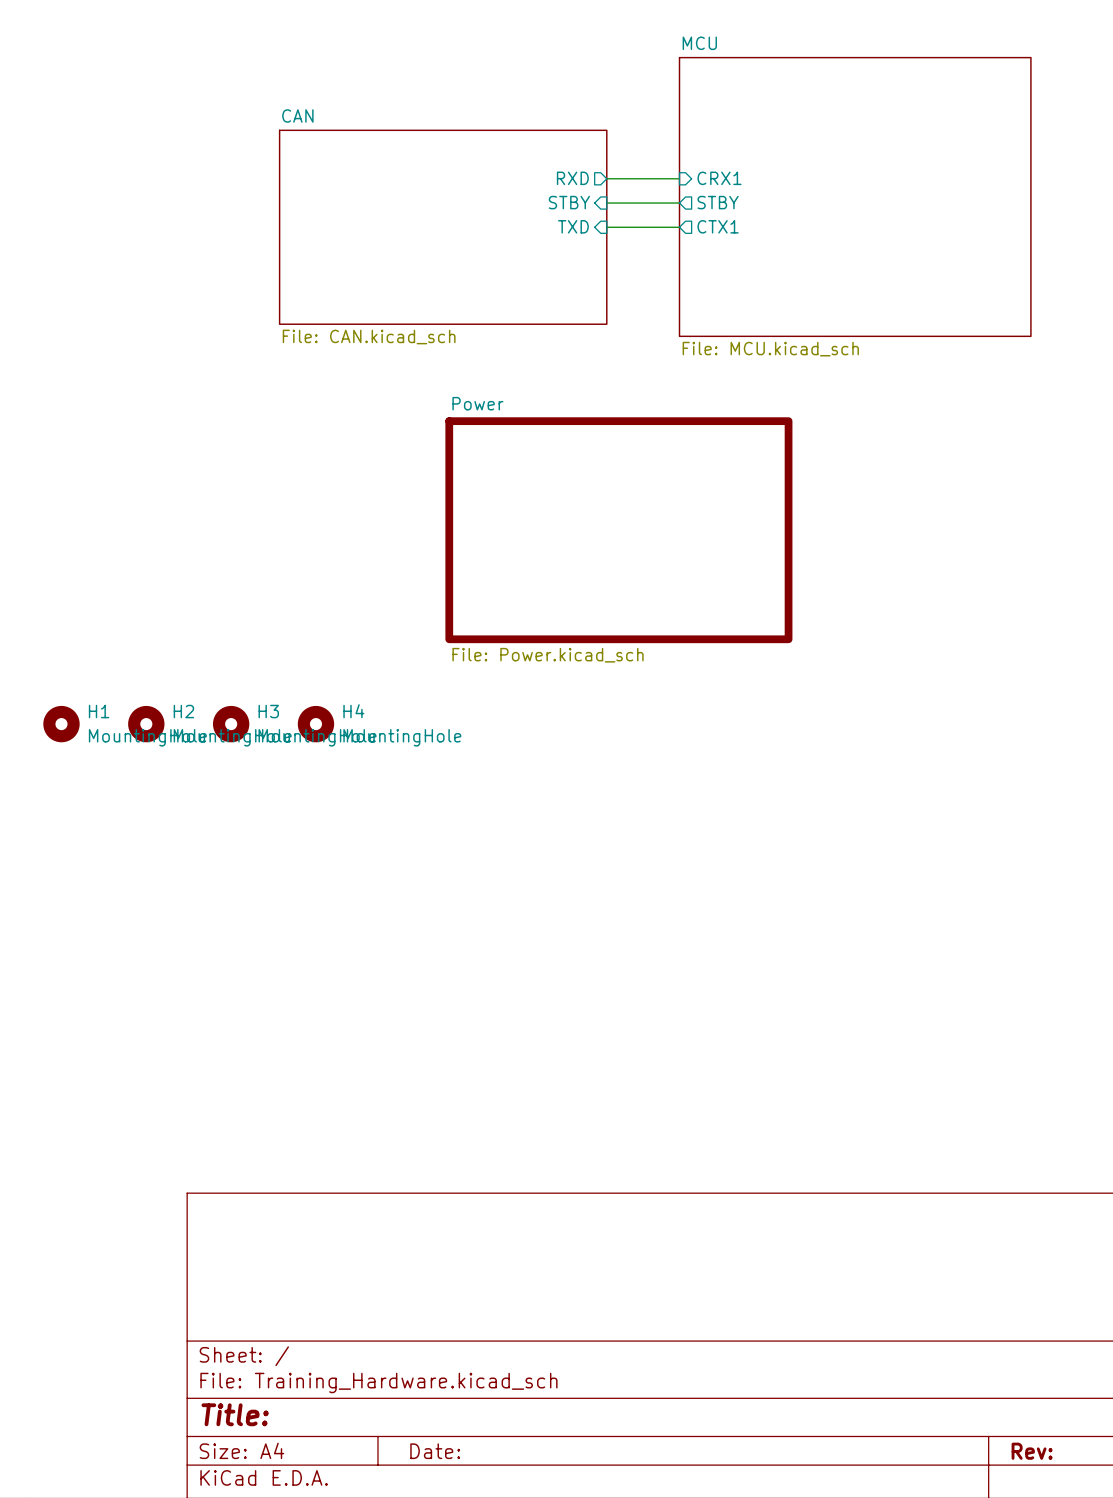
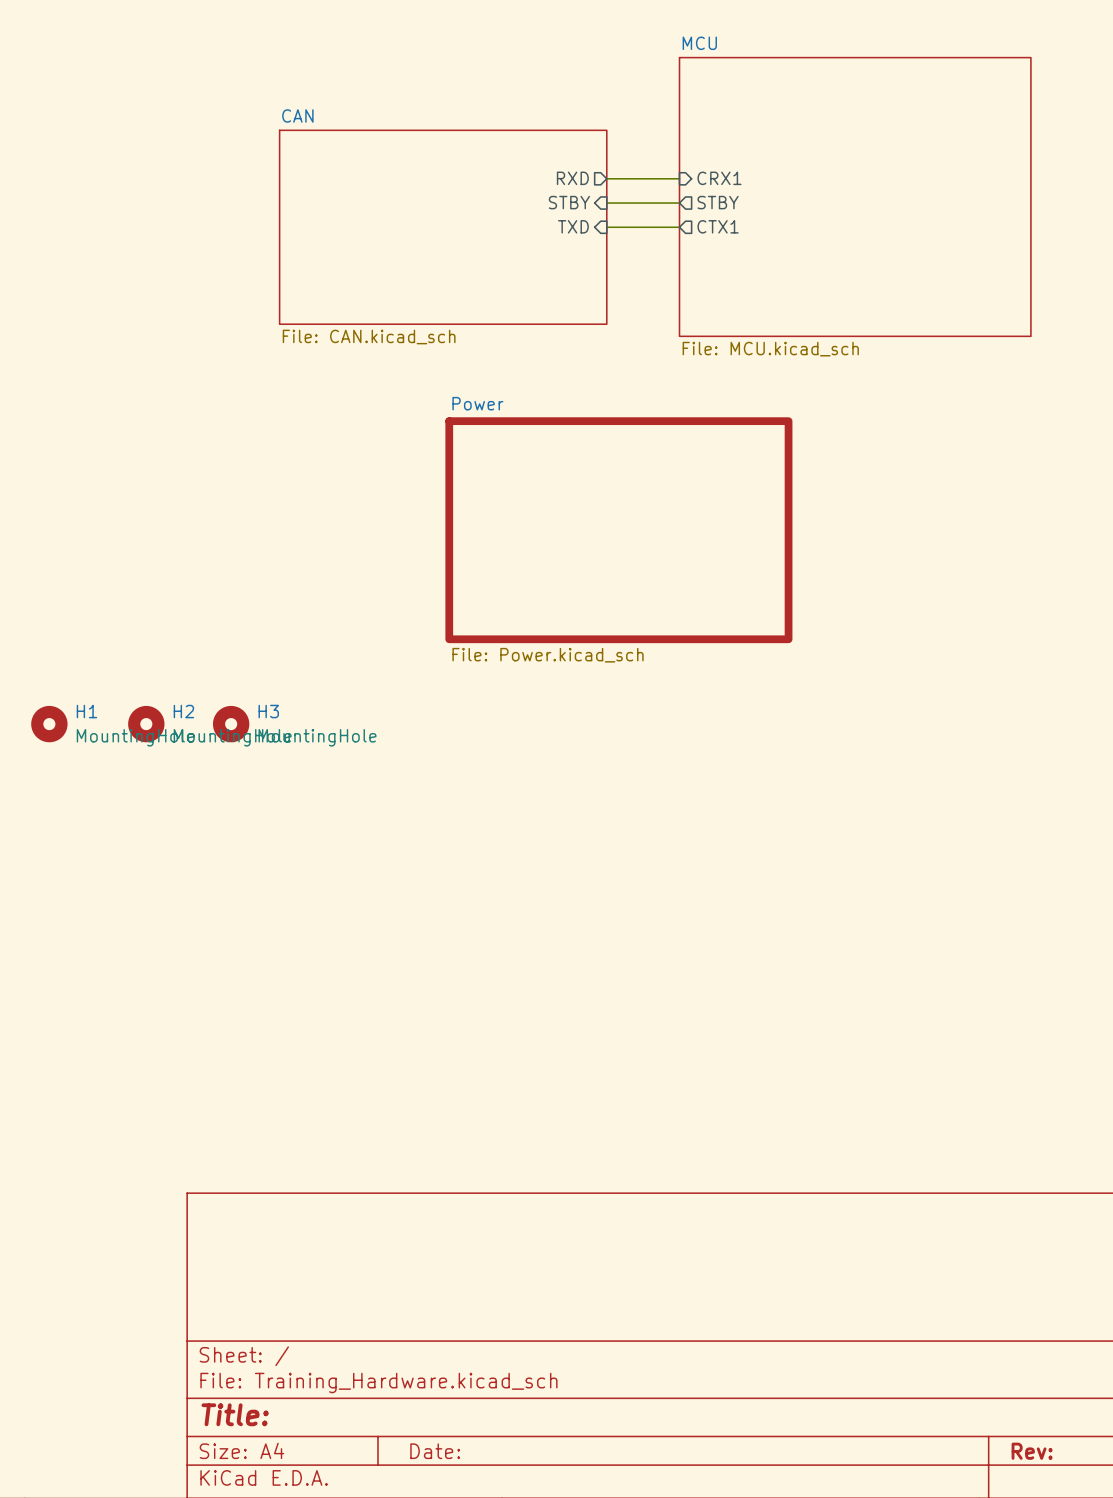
H1 position: (61, 724) -> (49, 724)
H4: MountingHole (315, 724) -> none

